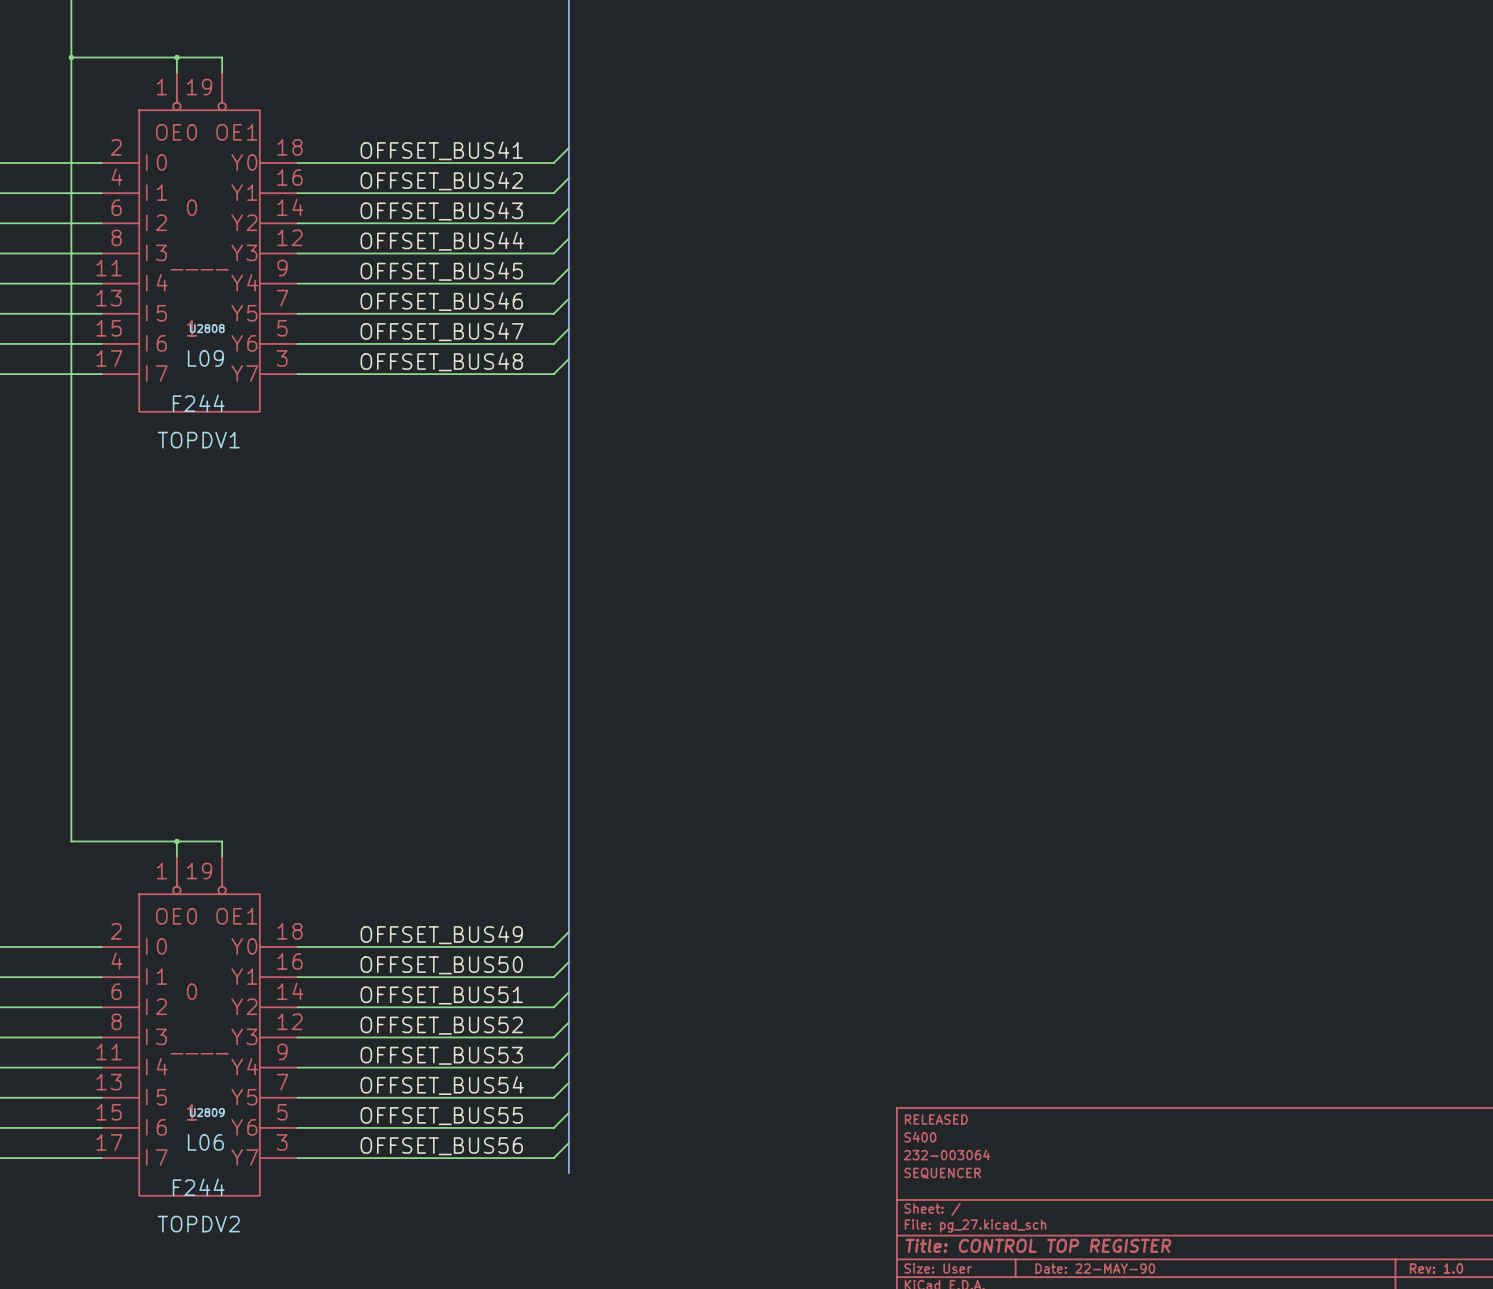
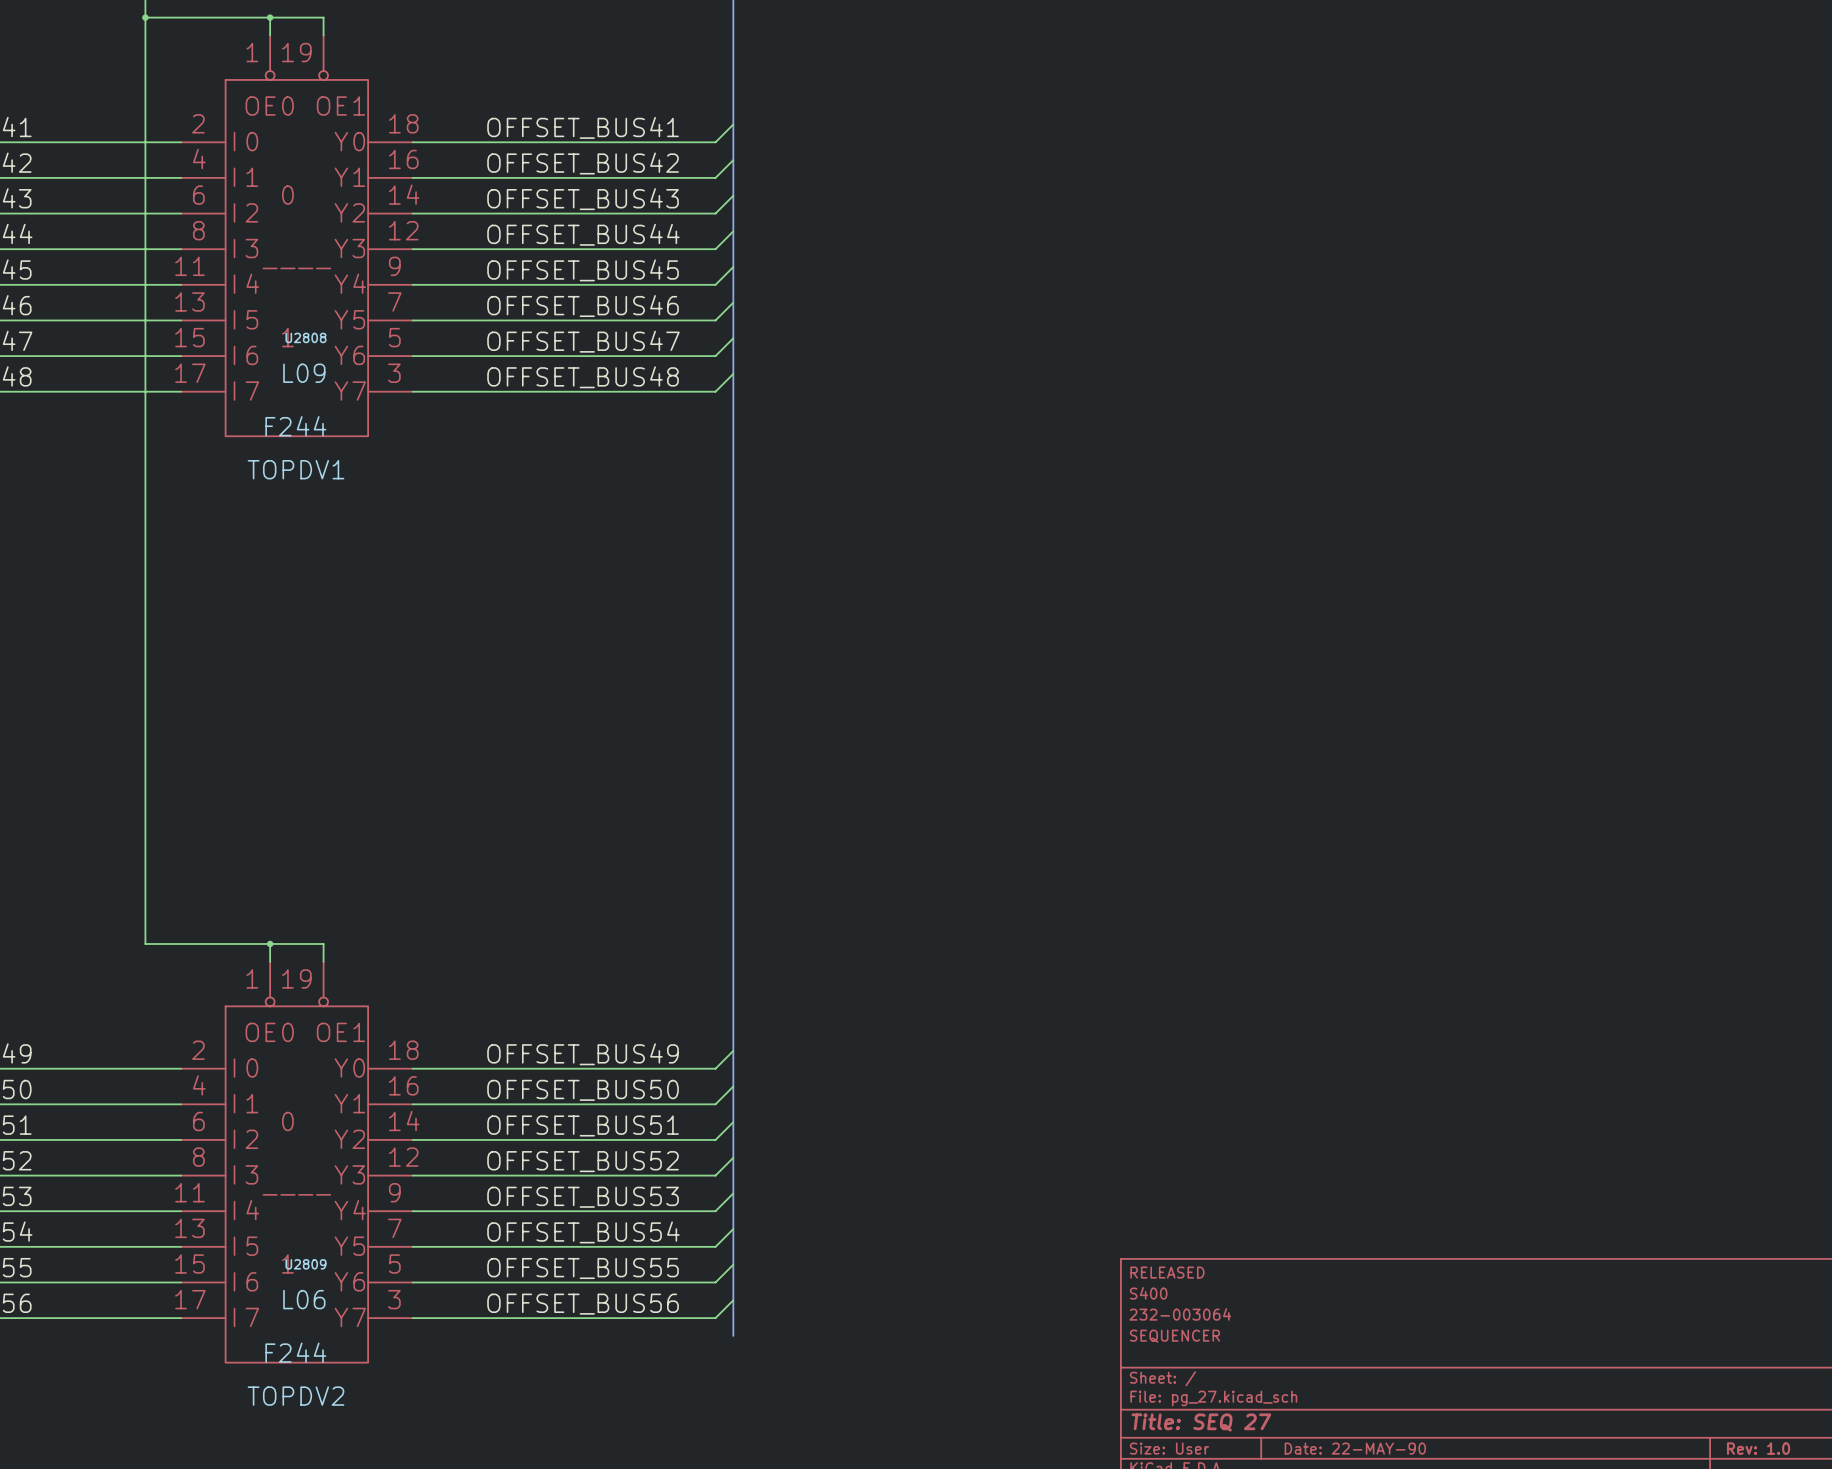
title block: Title: CONTROL TOP REGISTER (1038, 1245) -> Title: SEQ 27 (1201, 1422)

